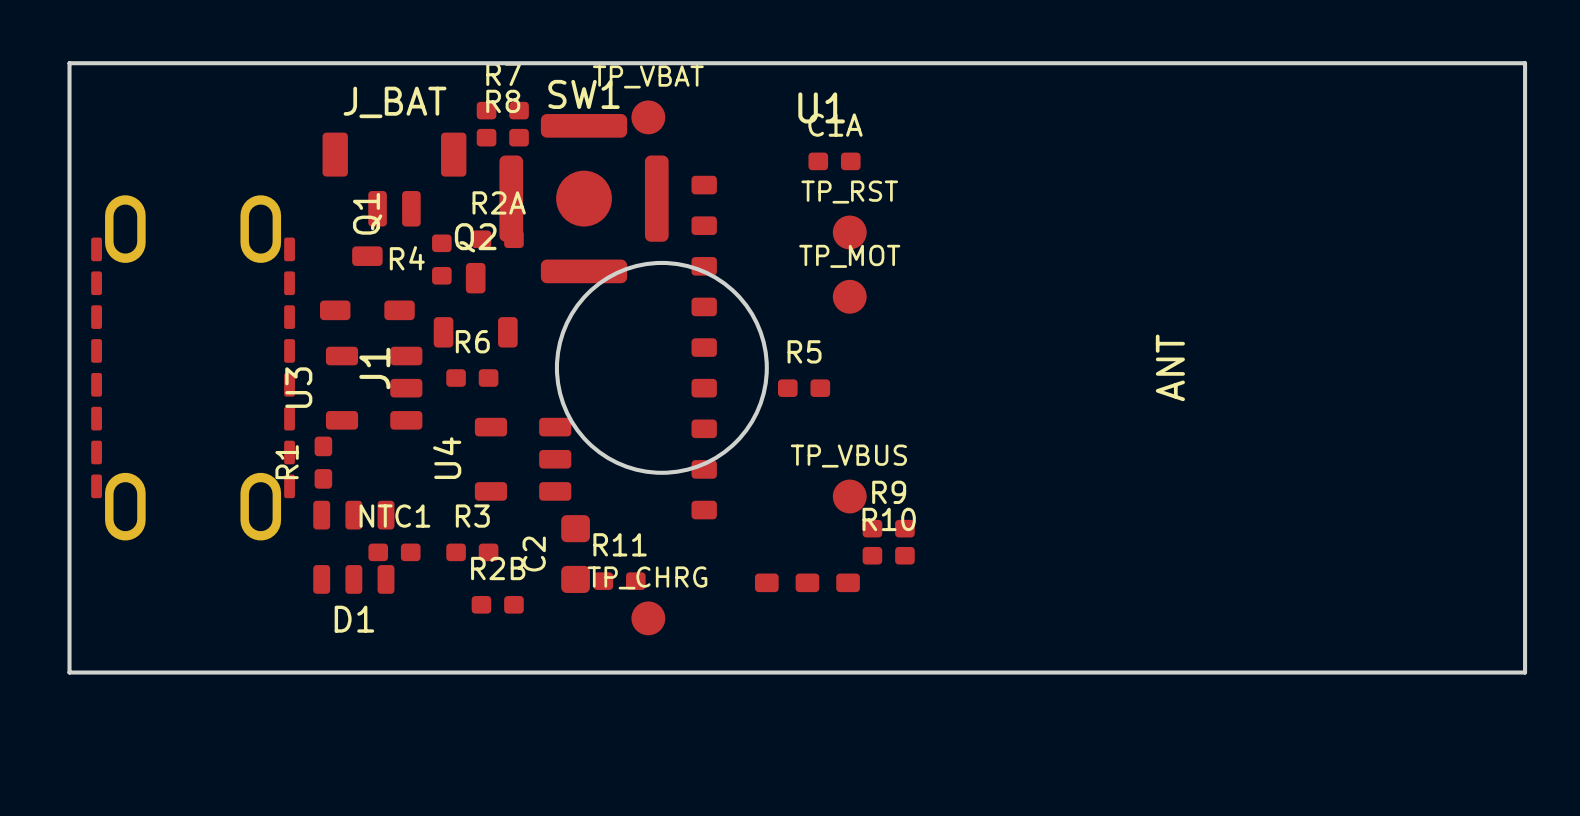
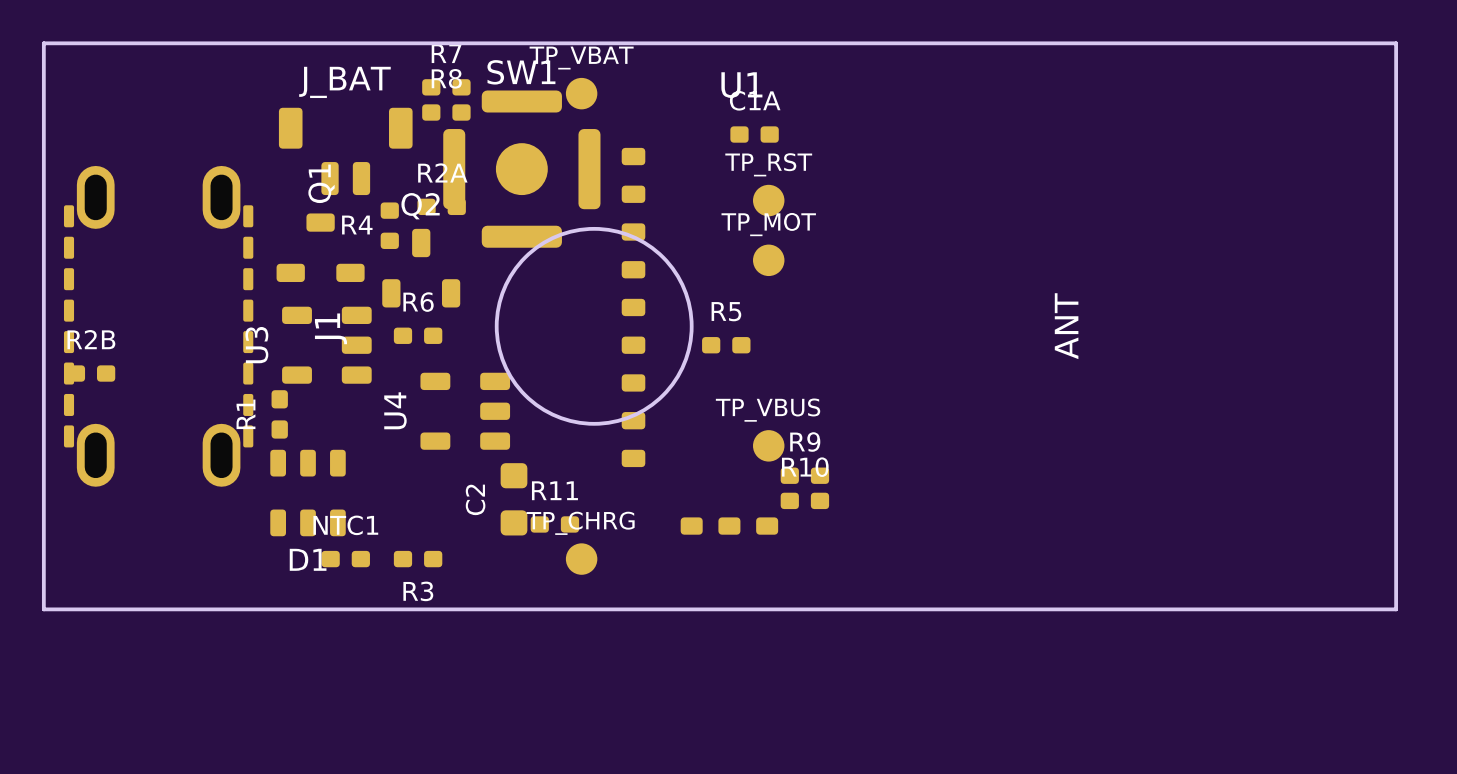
R3 name position: R3 (472, 516) -> R3 (418, 591)
NTC1 position: (394, 552) -> (345, 559)
R3 position: (472, 552) -> (418, 559)
R2B position: (497, 604) -> (91, 373)

